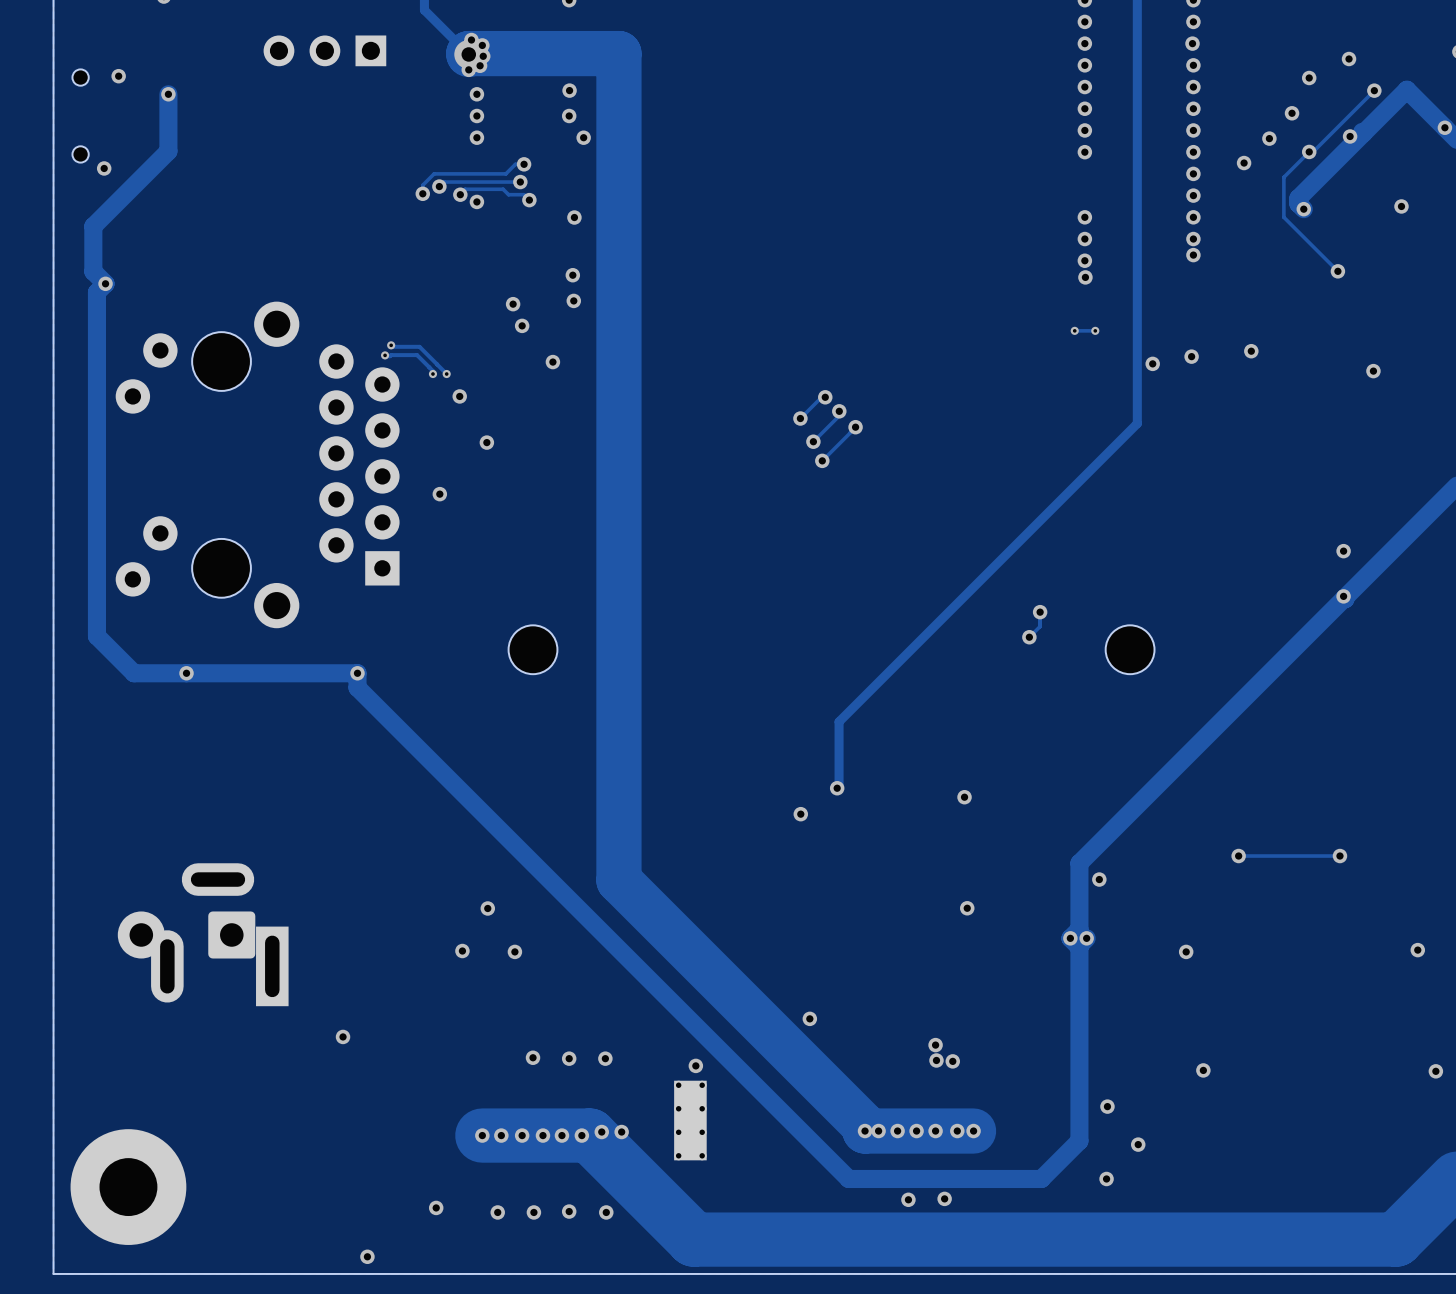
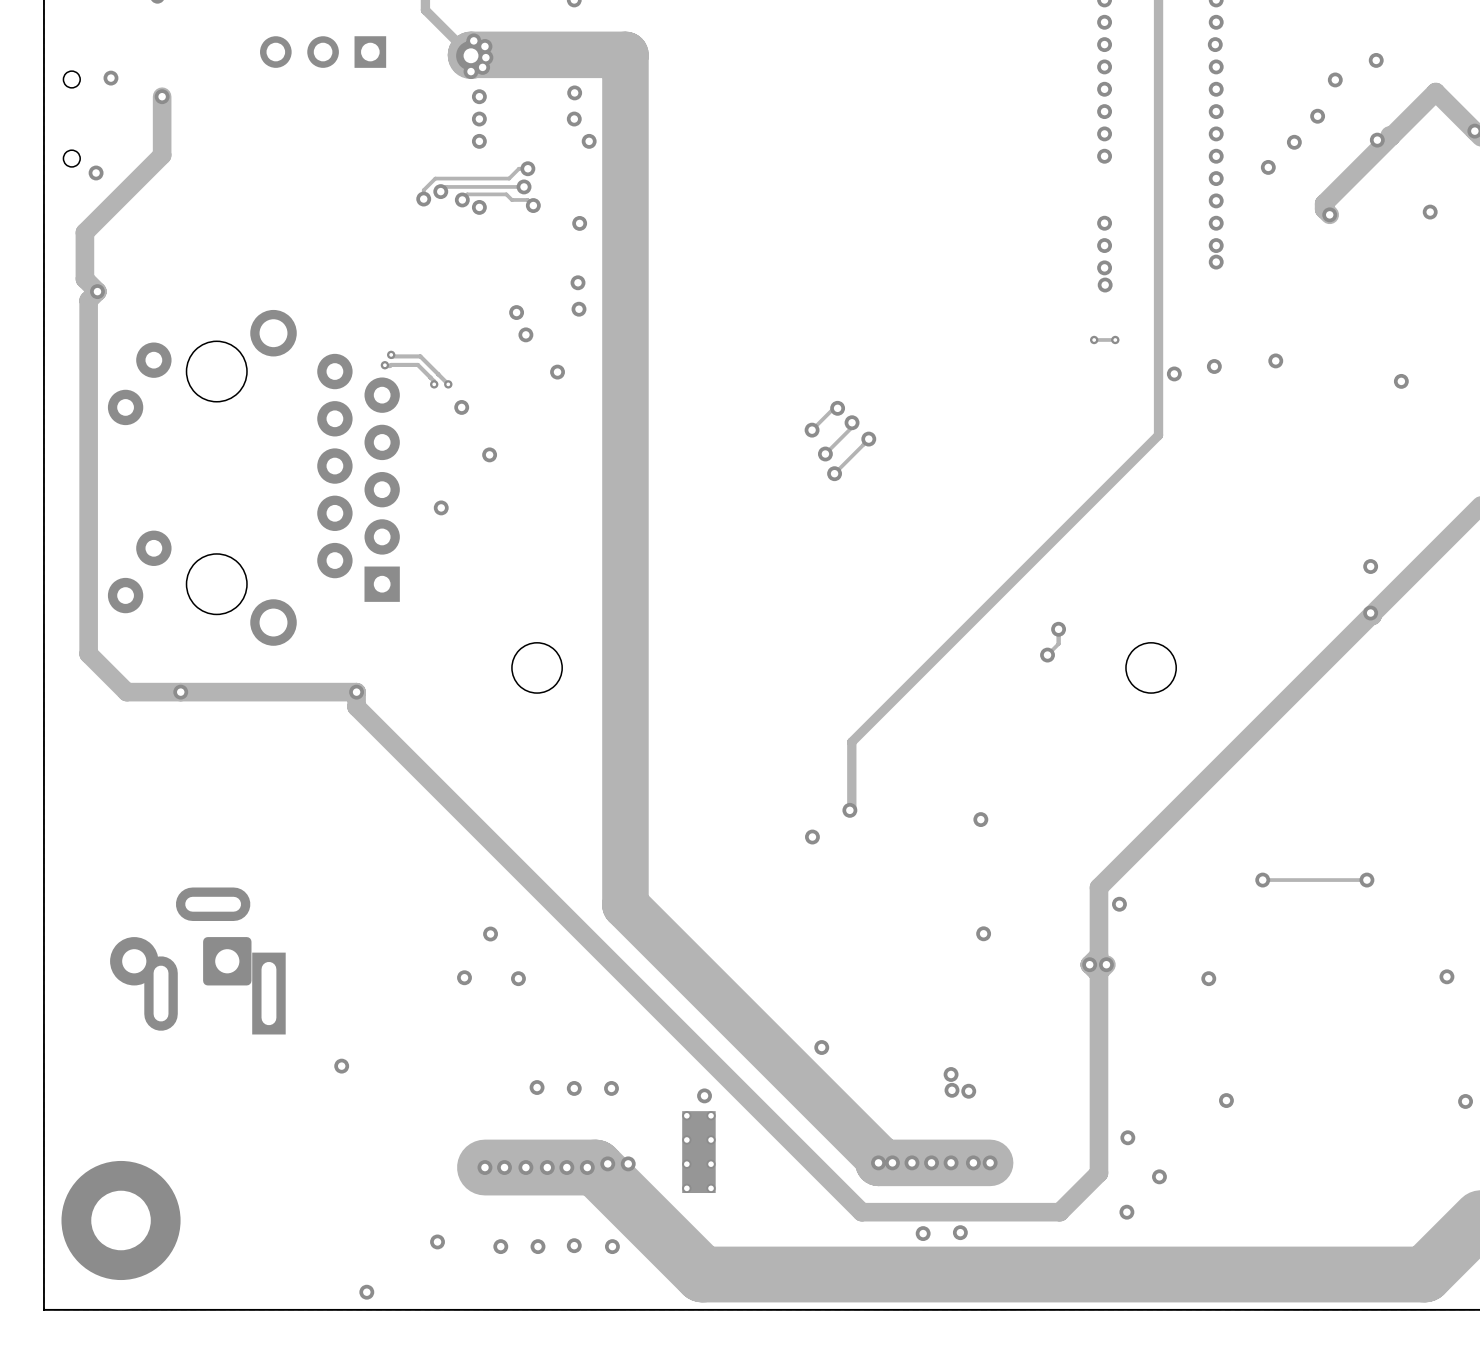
track: (1374, 90) (1313, 151) (1309, 151) (1283, 177) (1283, 217) (1337, 271) -> none
via: (1374, 90) -> none
via: (1309, 151) -> none
via: (1337, 271) -> none

